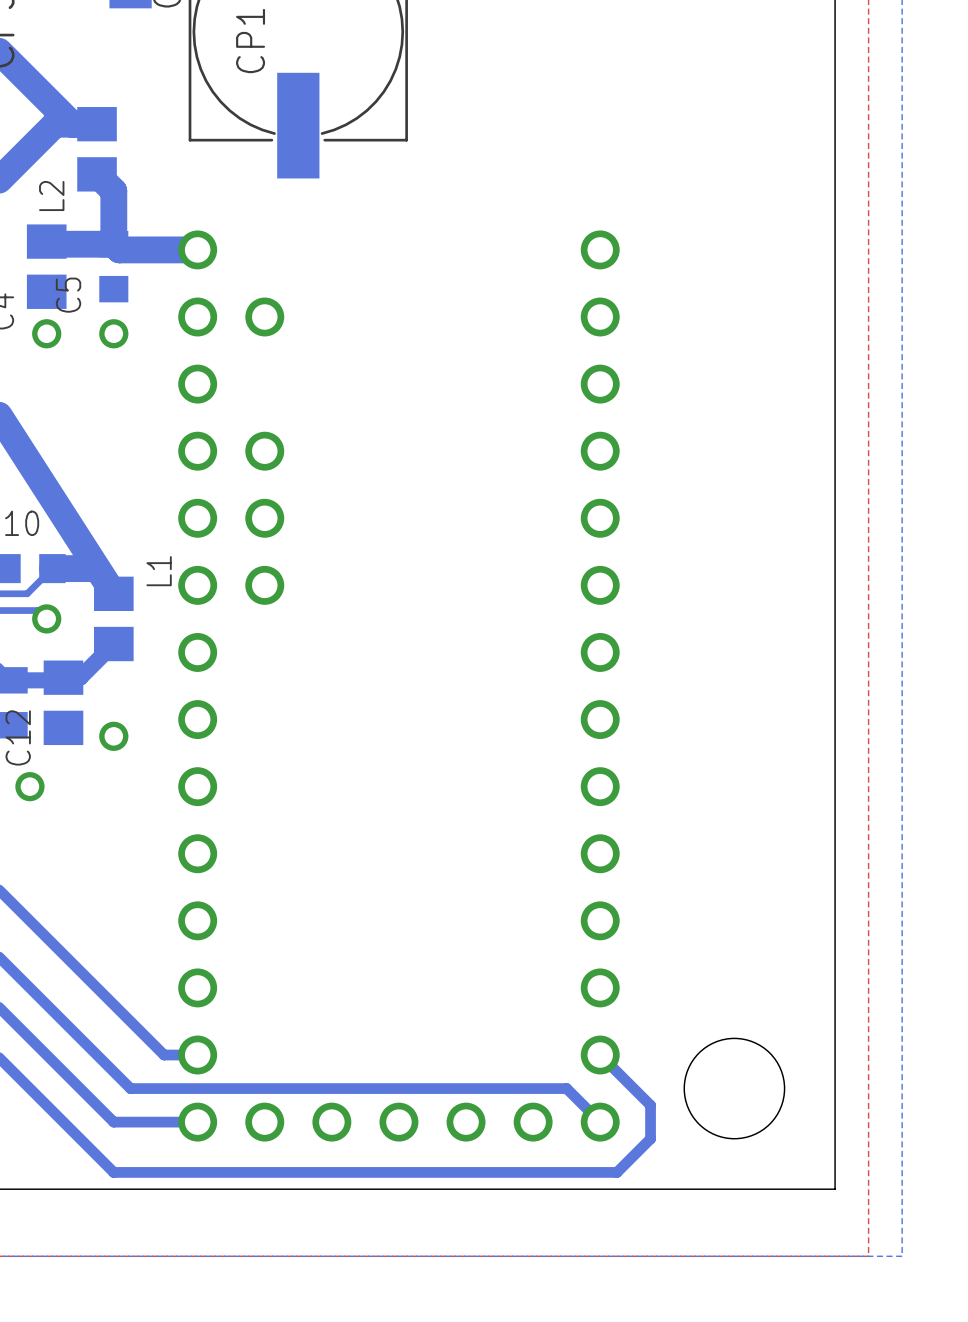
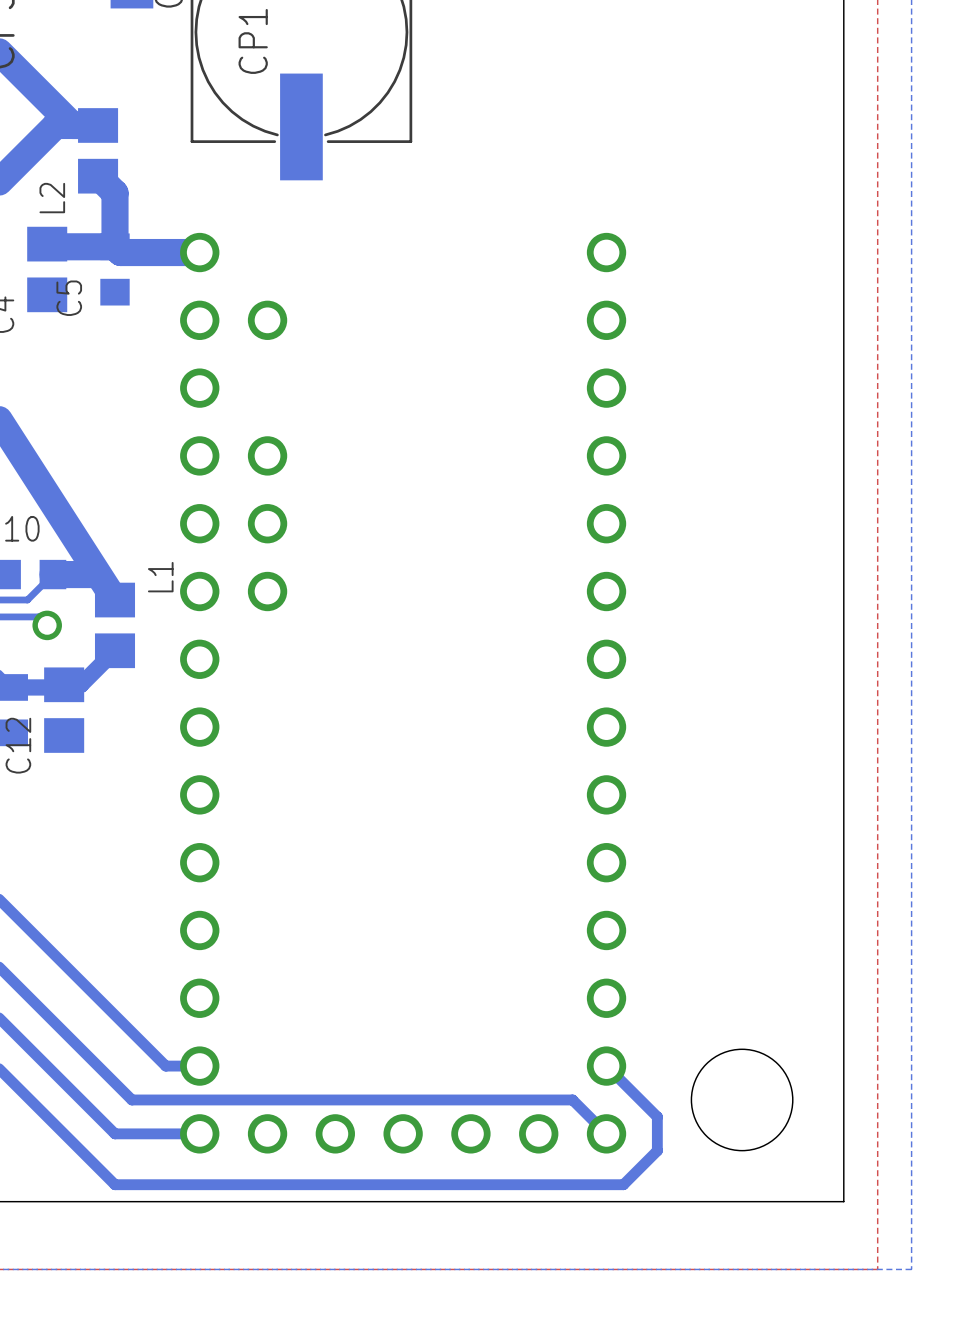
via: (46, 333) -> none
via: (113, 333) -> none
via: (113, 736) -> none
via: (29, 786) -> none

